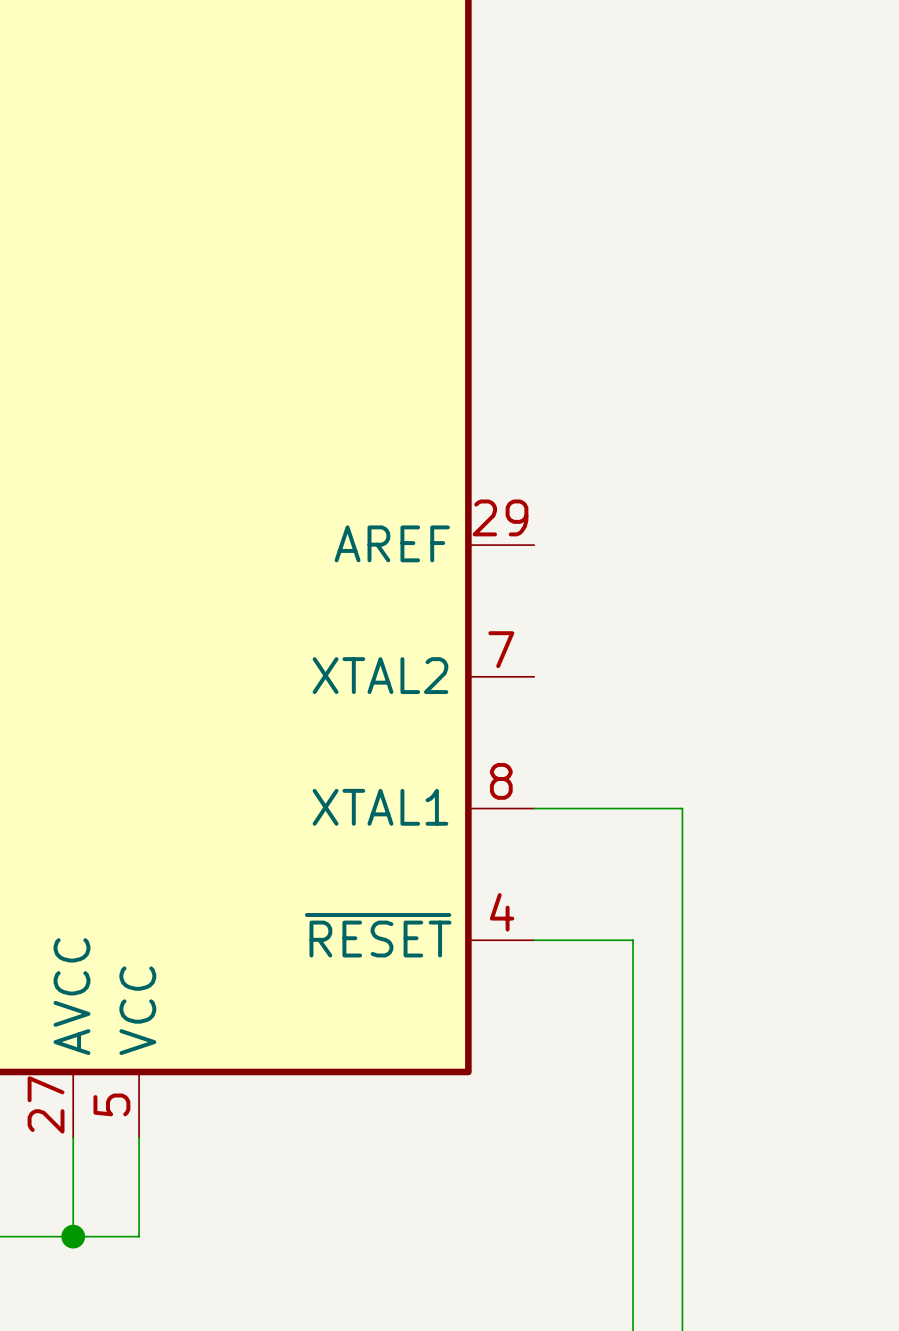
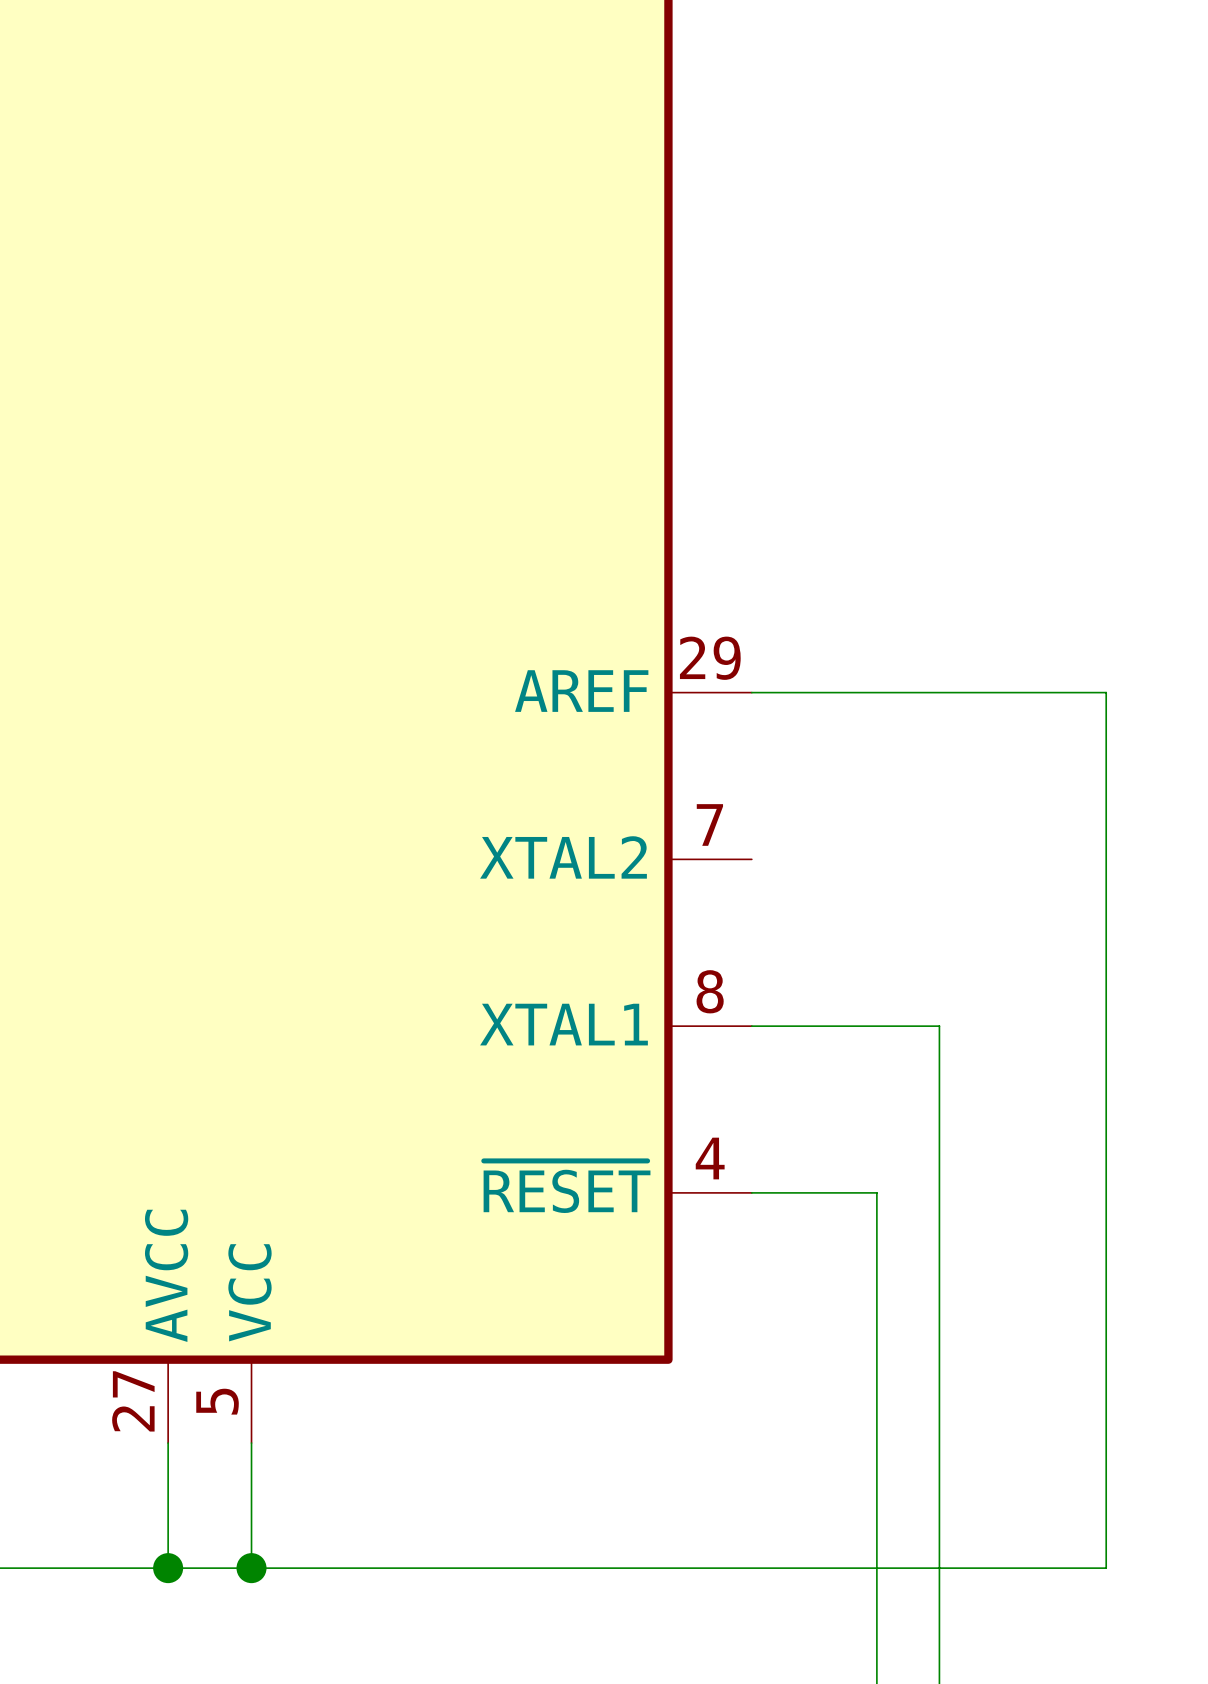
wire: none -> (751, 692) (1106, 692) (1106, 1568) (251, 1568)
junction: none -> (251, 1568)

